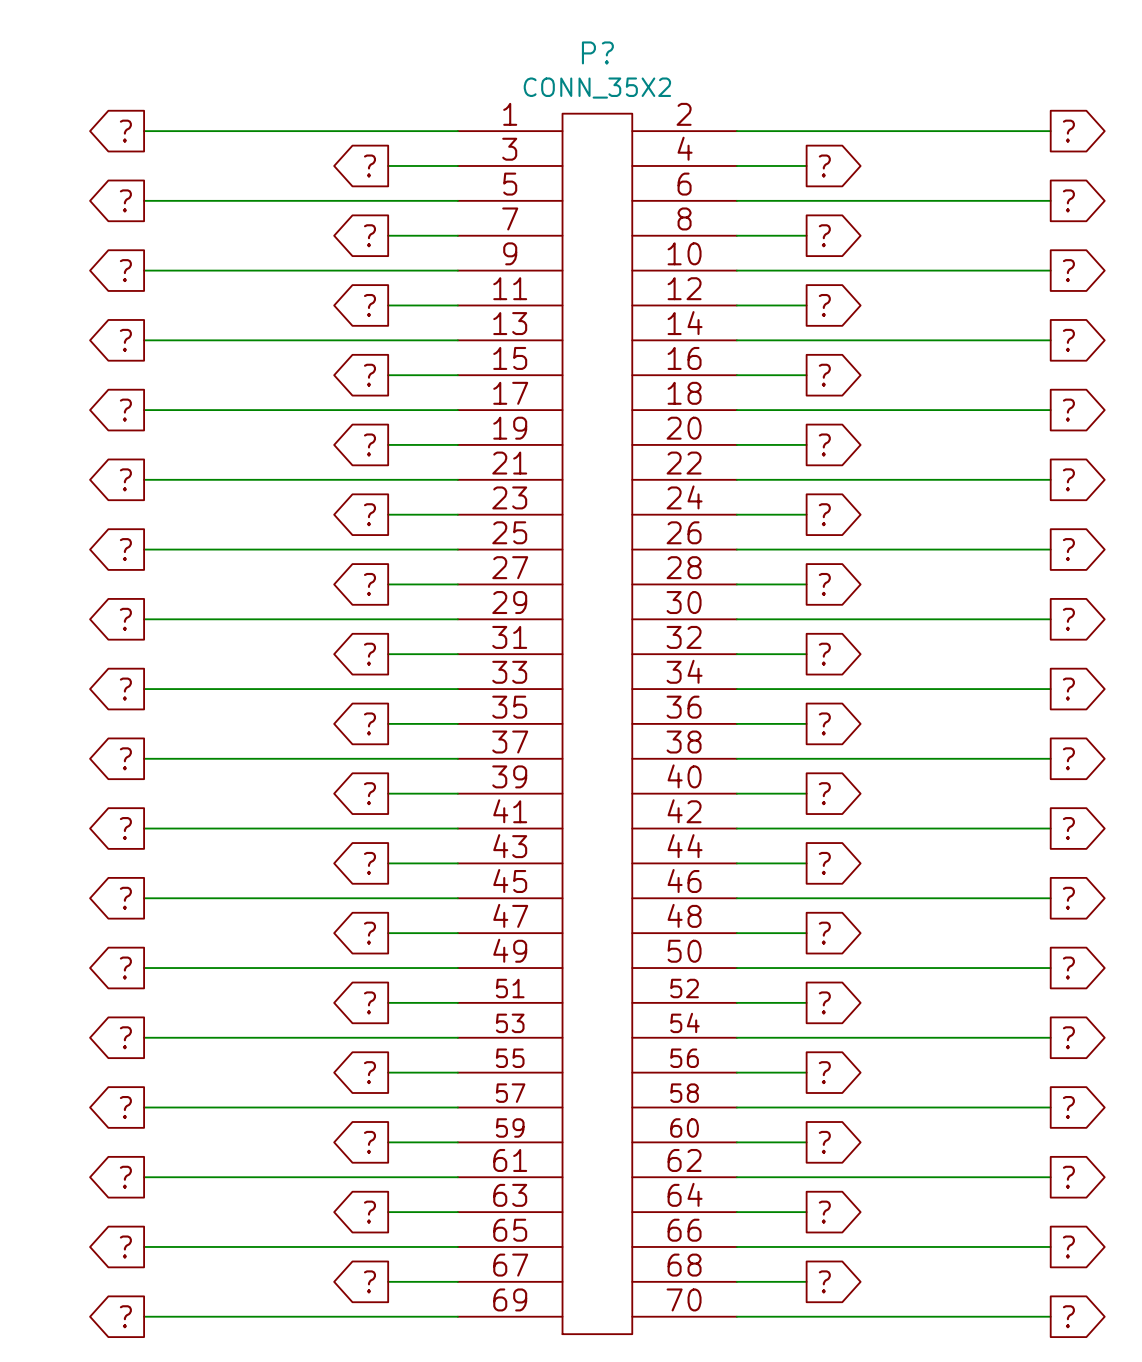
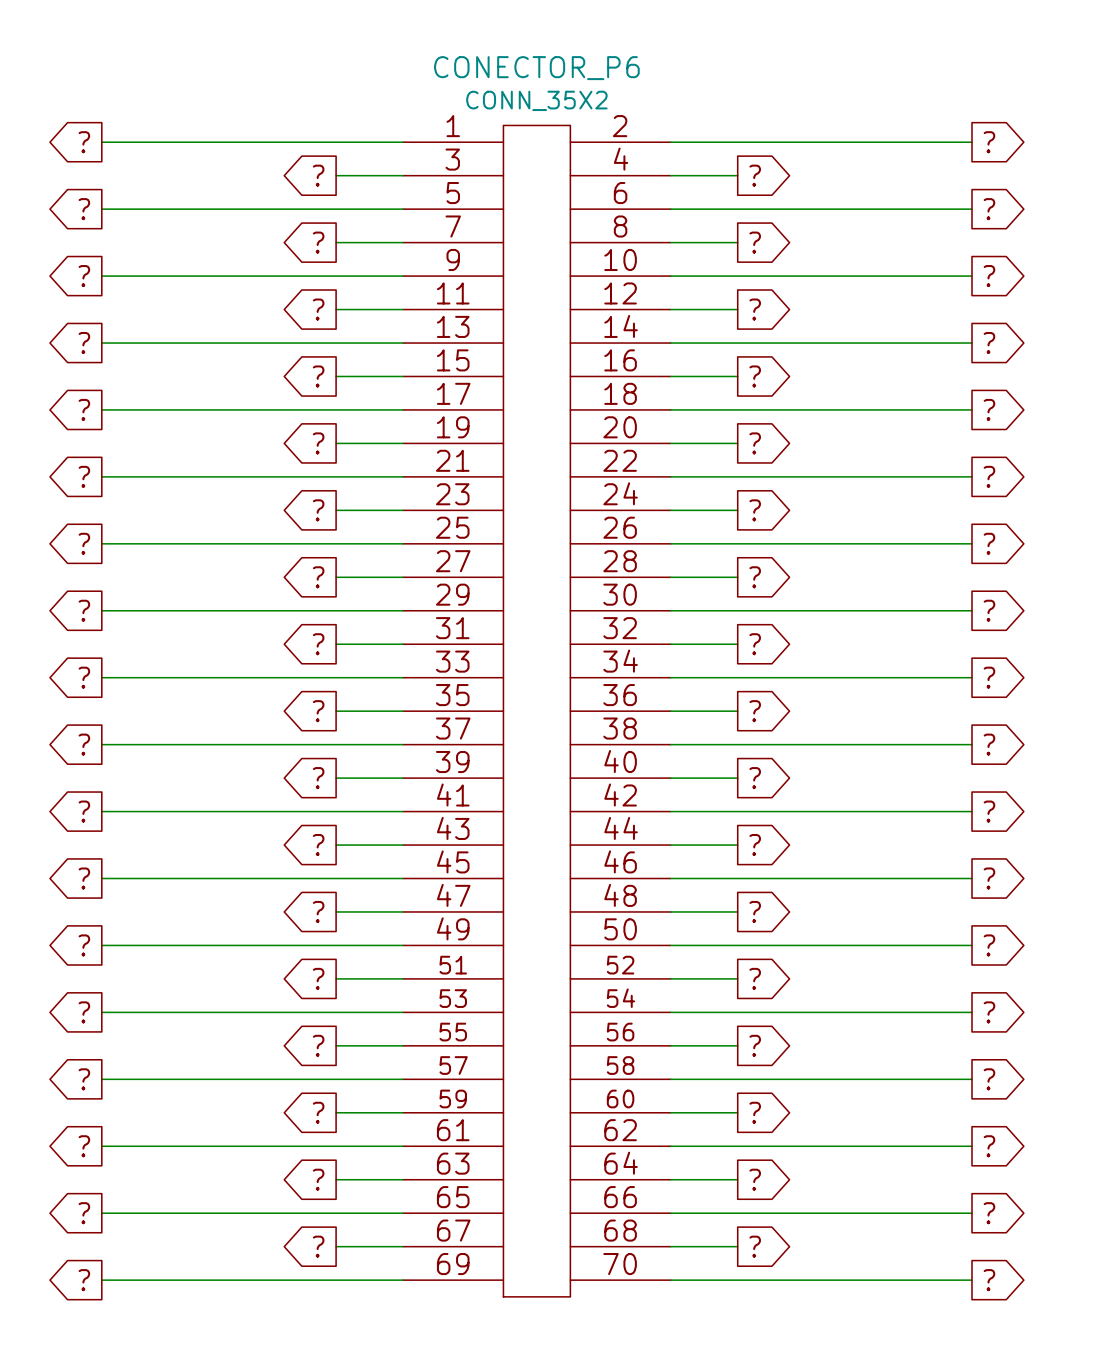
P? name: P? (597, 52) -> CONECTOR_P6 (536, 68)

